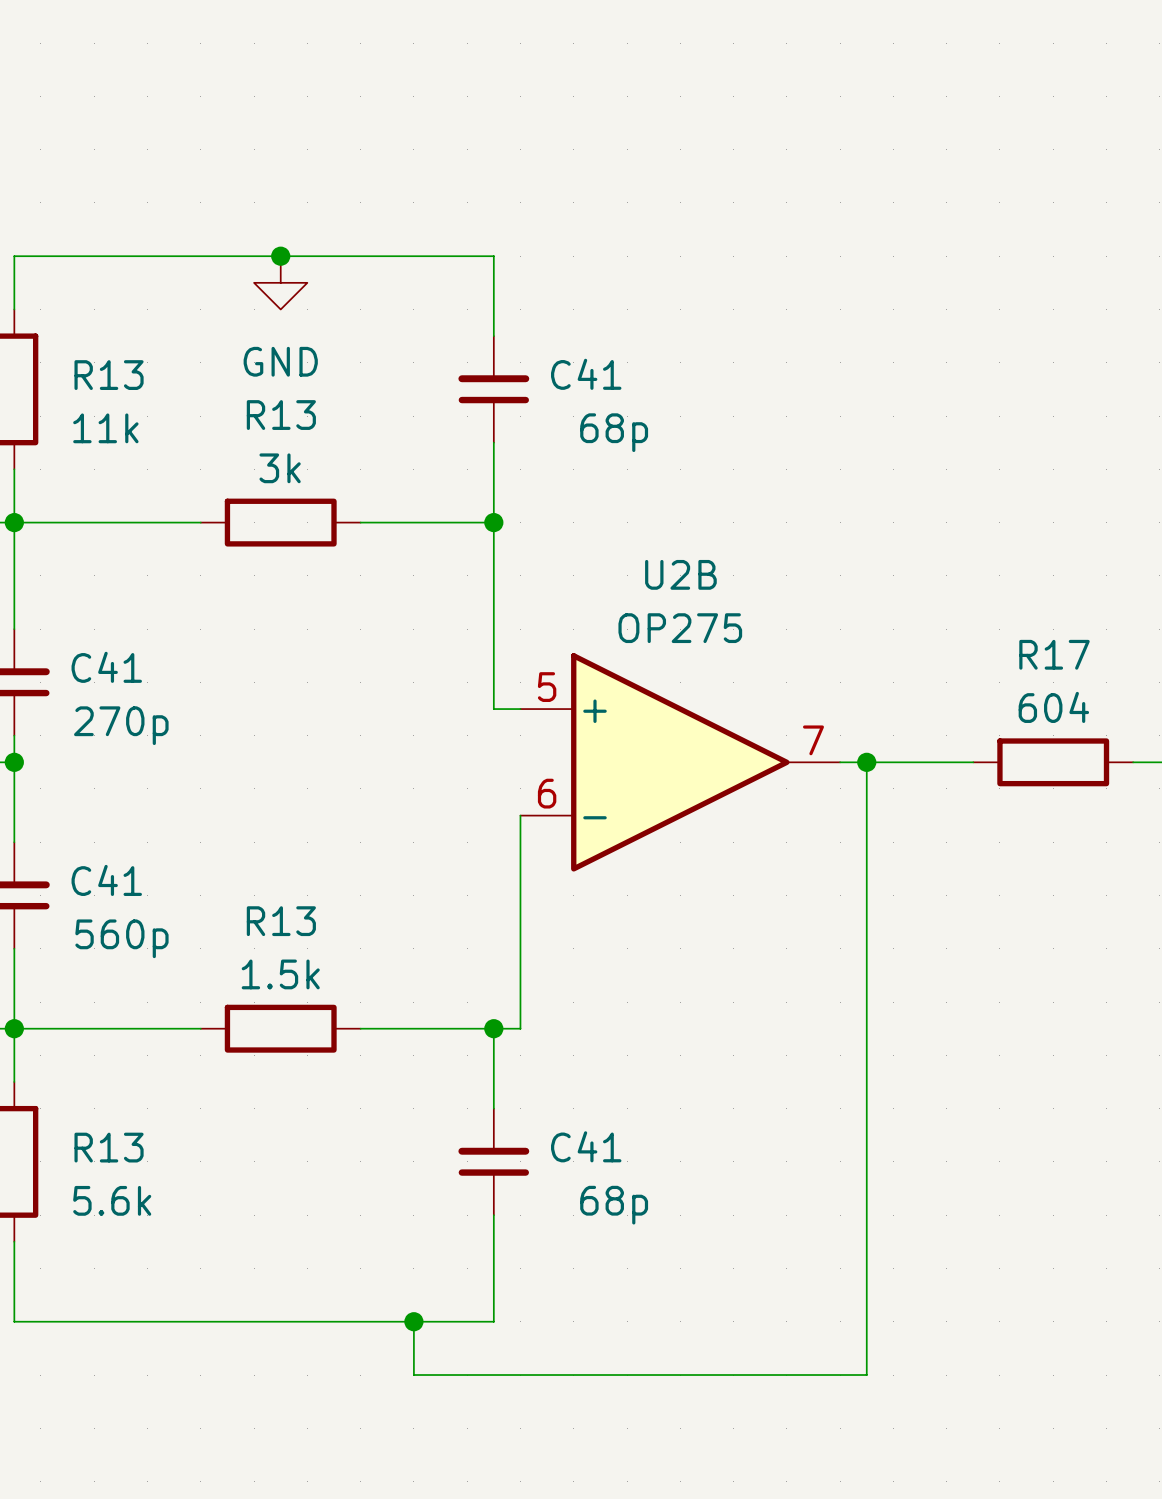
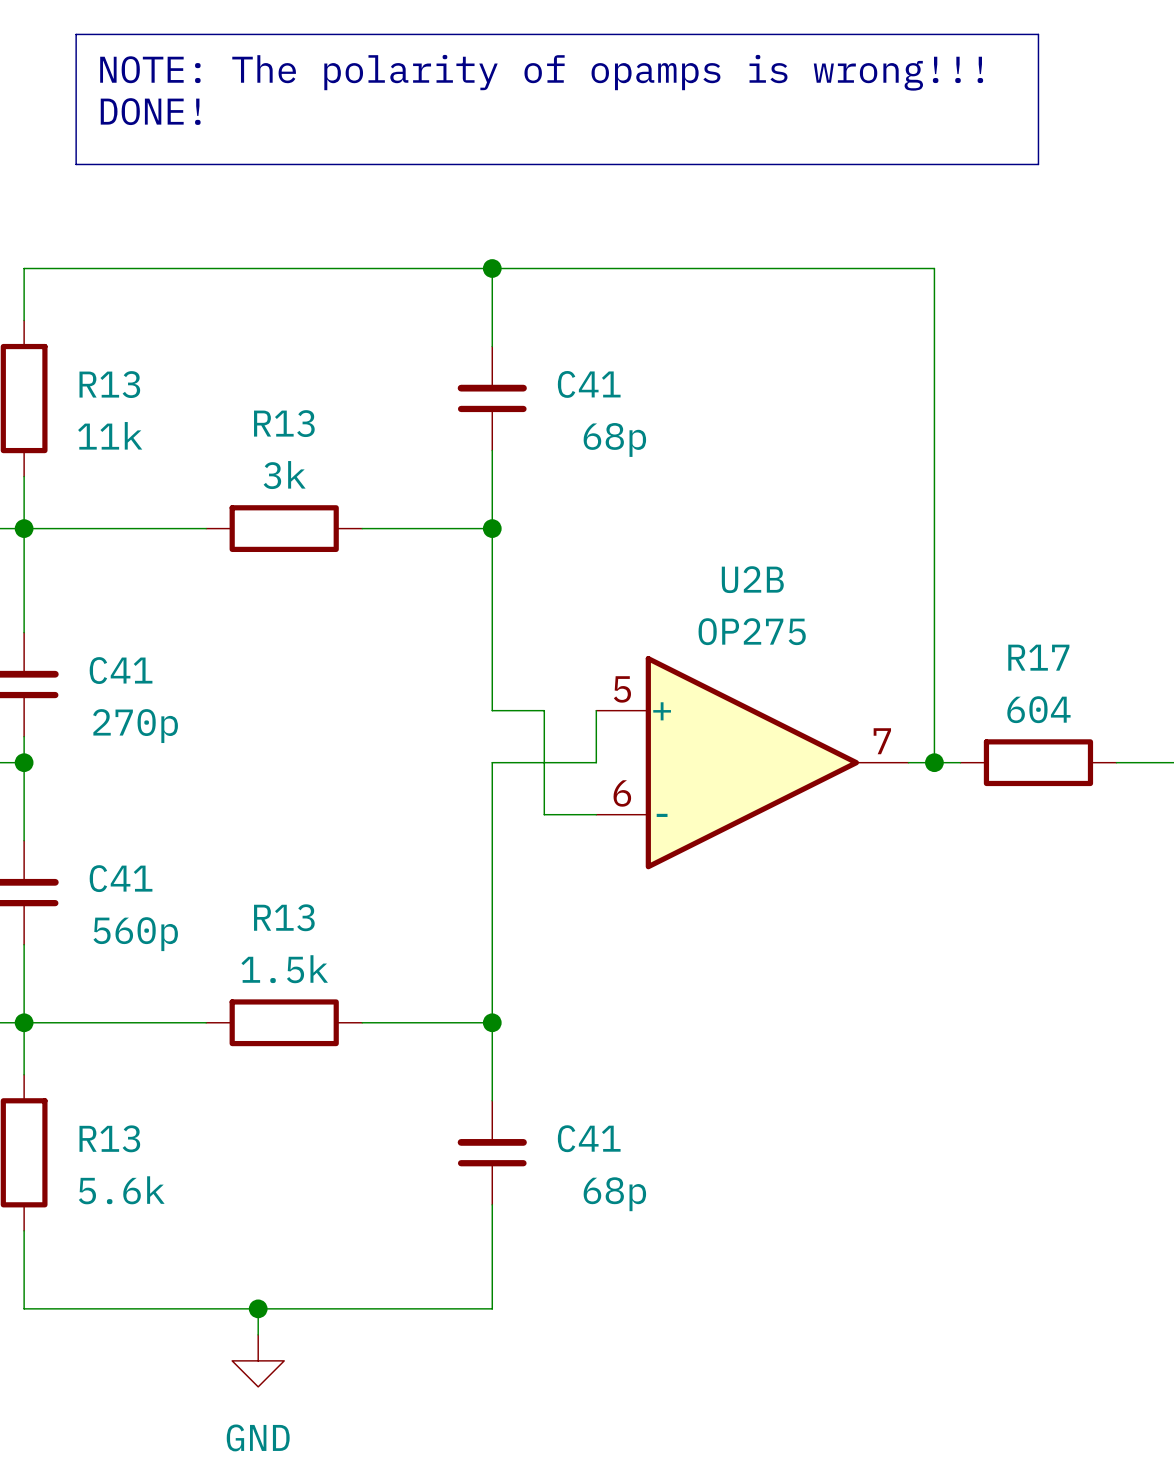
line: none -> (76, 34) (1038, 34) (1038, 164) (76, 164) (76, 34)
text: none -> NOTE: The polarity of opamps is wrong!!! (541, 72)
text: none -> DONE! (150, 111)
junction: (280, 256) -> none
wire: none -> (492, 268) (934, 268) (934, 762)
junction: none -> (492, 268)
power symbol: GND (280, 282) -> none
wire: none -> (518, 710) (544, 710) (544, 814) (596, 814)
U2B position: (680, 762) -> (752, 762)
wire: (866, 762) (866, 1375) (413, 1375) (413, 1321) -> none
junction position: (866, 762) -> (934, 762)
wire: (520, 815) (520, 1028) (493, 1028) -> (596, 710) (596, 762) (492, 762) (492, 1022)
wire: none -> (258, 1308) (258, 1334)
junction: none -> (258, 1308)
junction: (413, 1321) -> none
power symbol: none -> GND (258, 1360)

